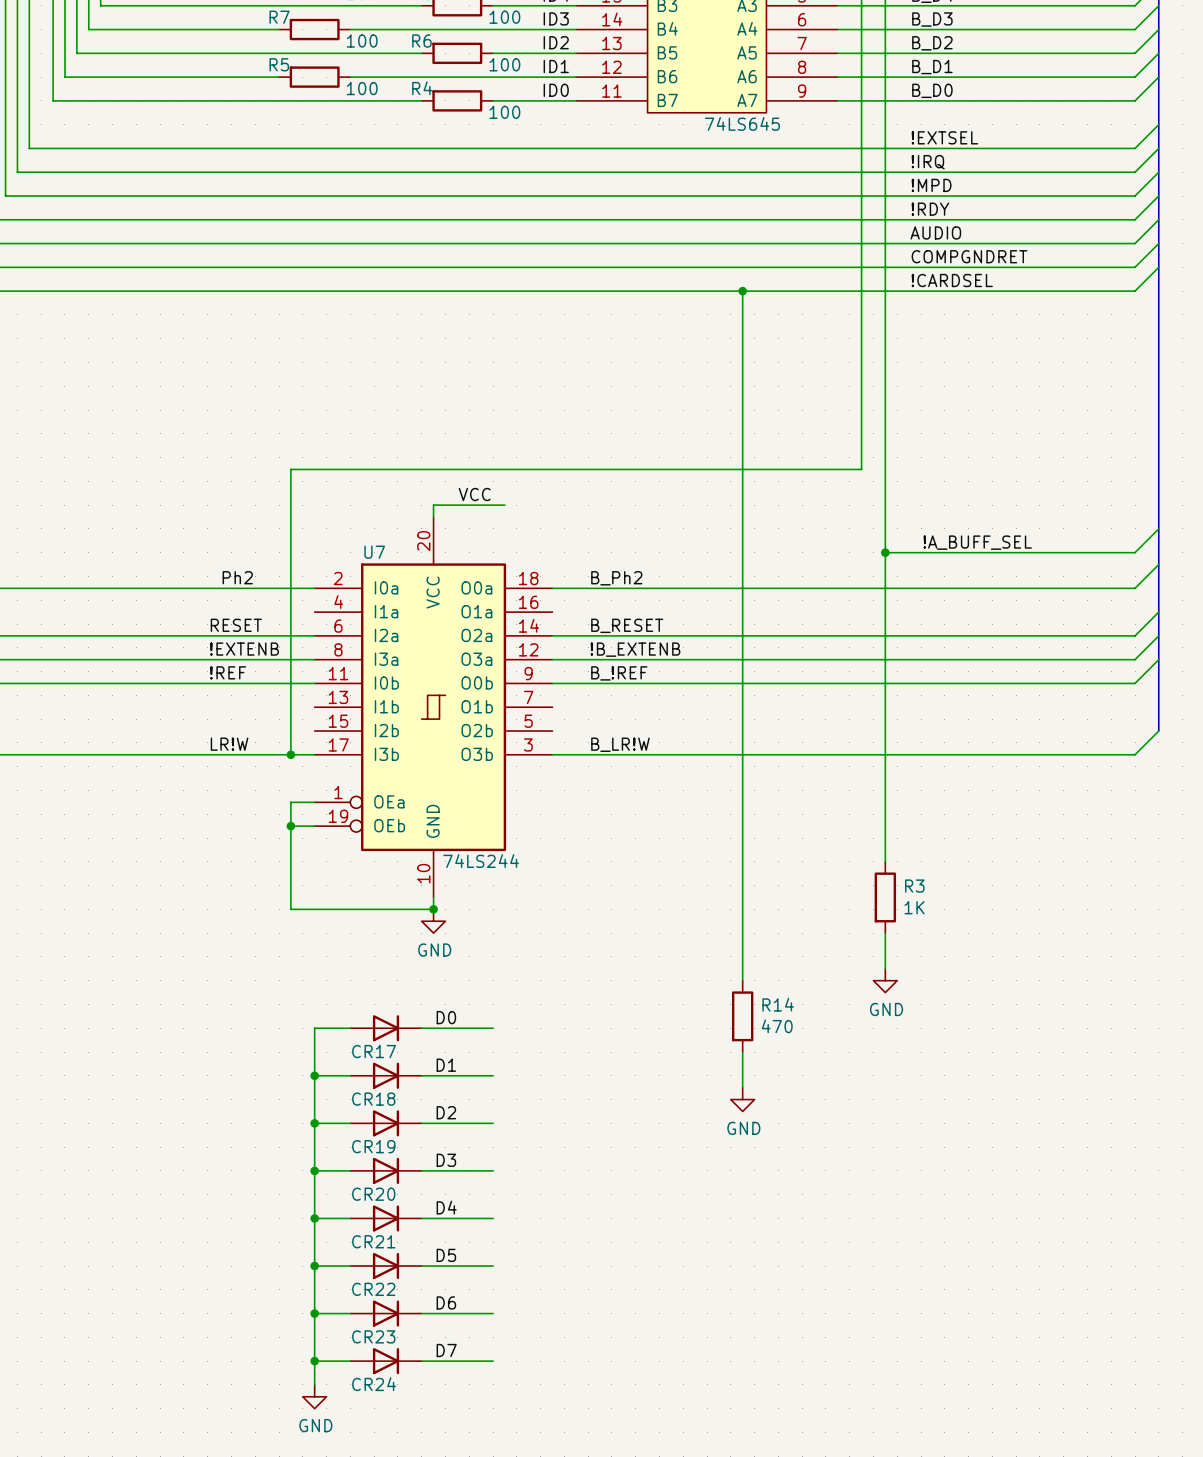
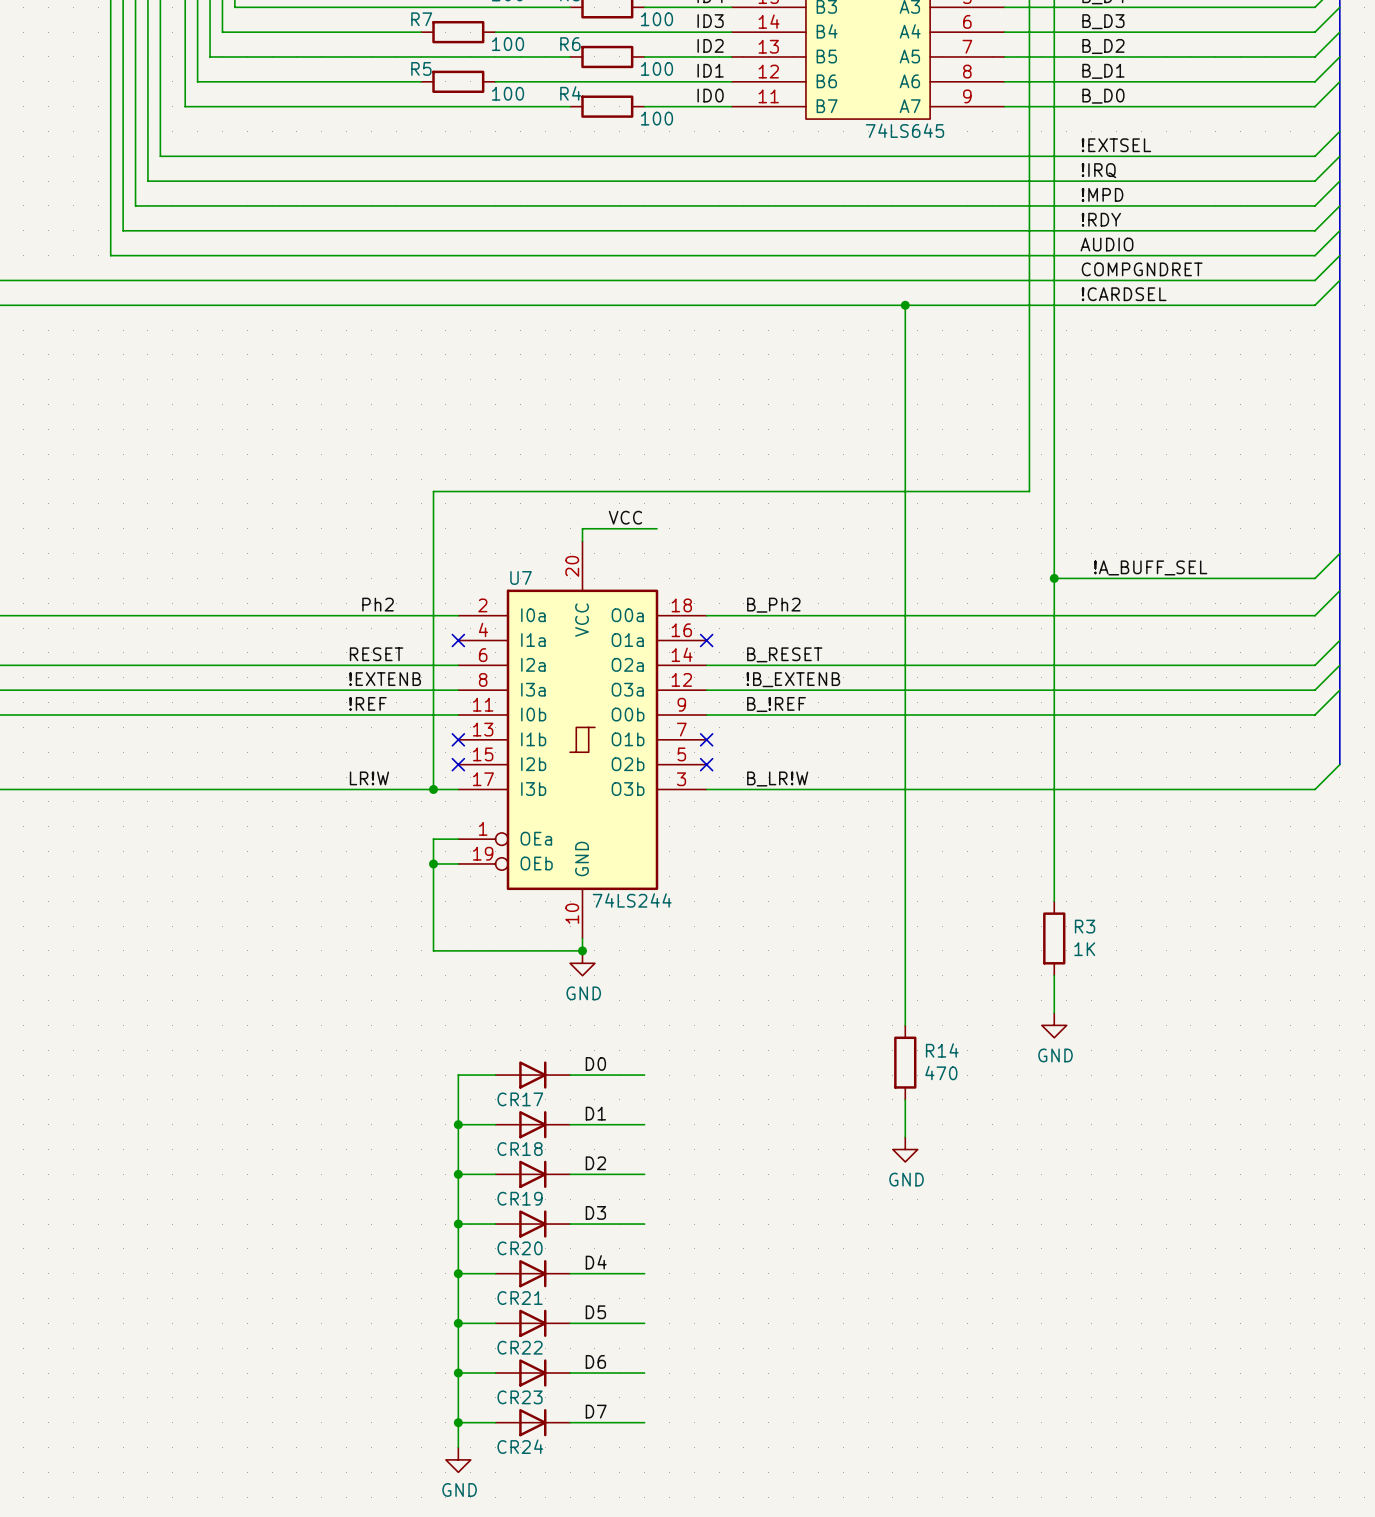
no-connect mark: none -> (458, 640)
no-connect mark: none -> (706, 640)
no-connect mark: none -> (458, 739)
no-connect mark: none -> (706, 739)
no-connect mark: none -> (458, 764)
no-connect mark: none -> (706, 764)

